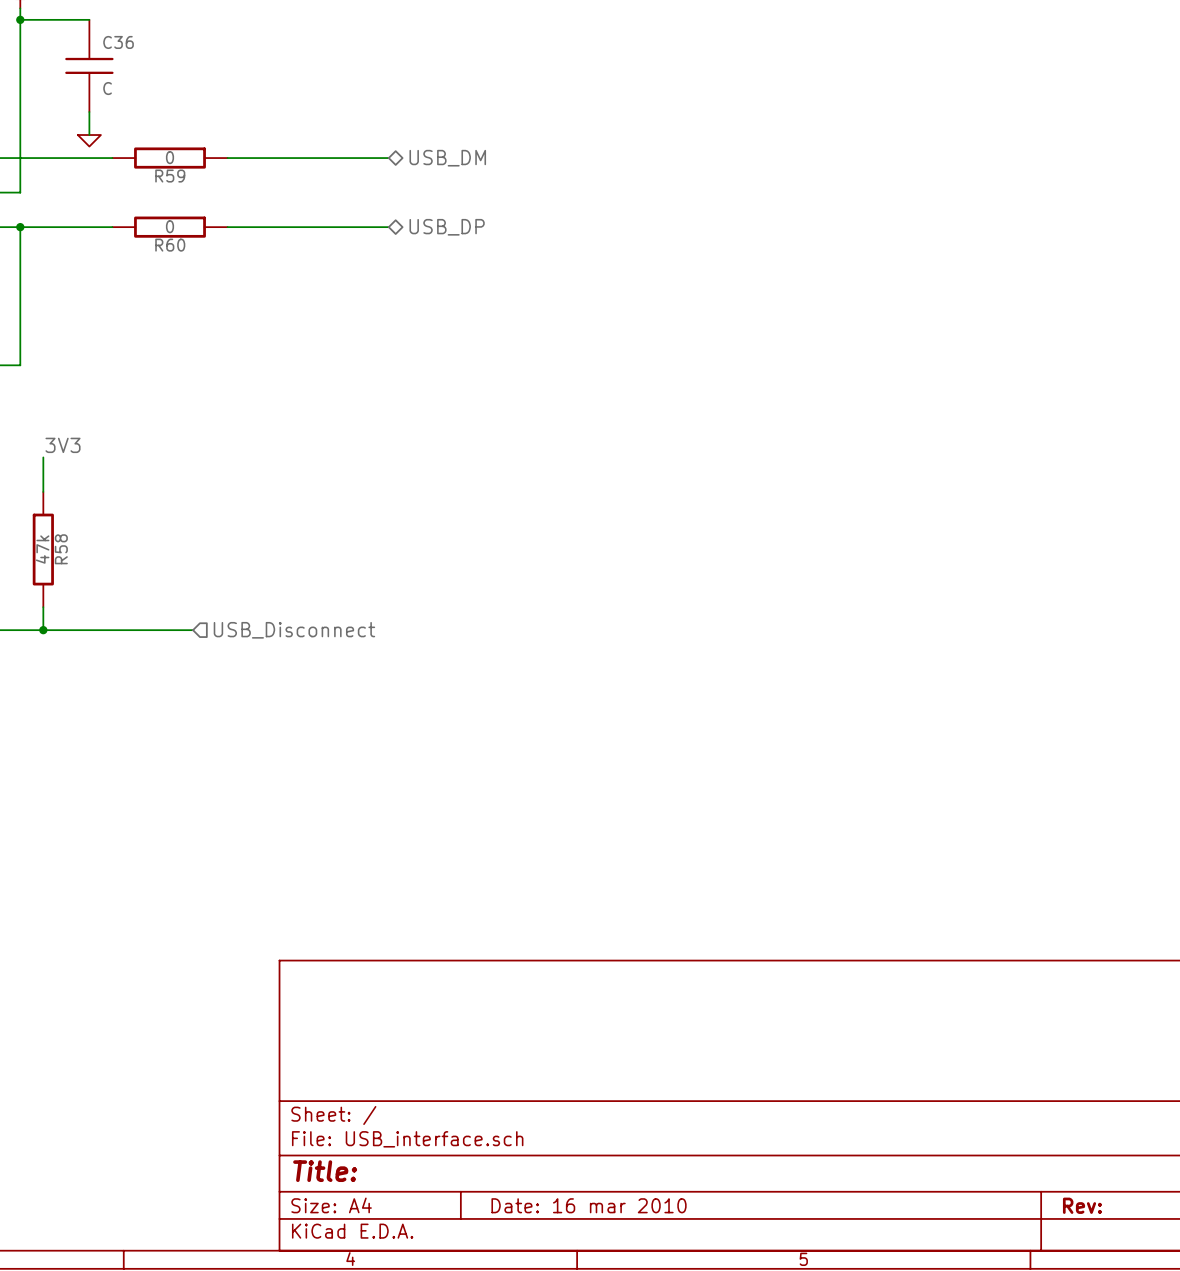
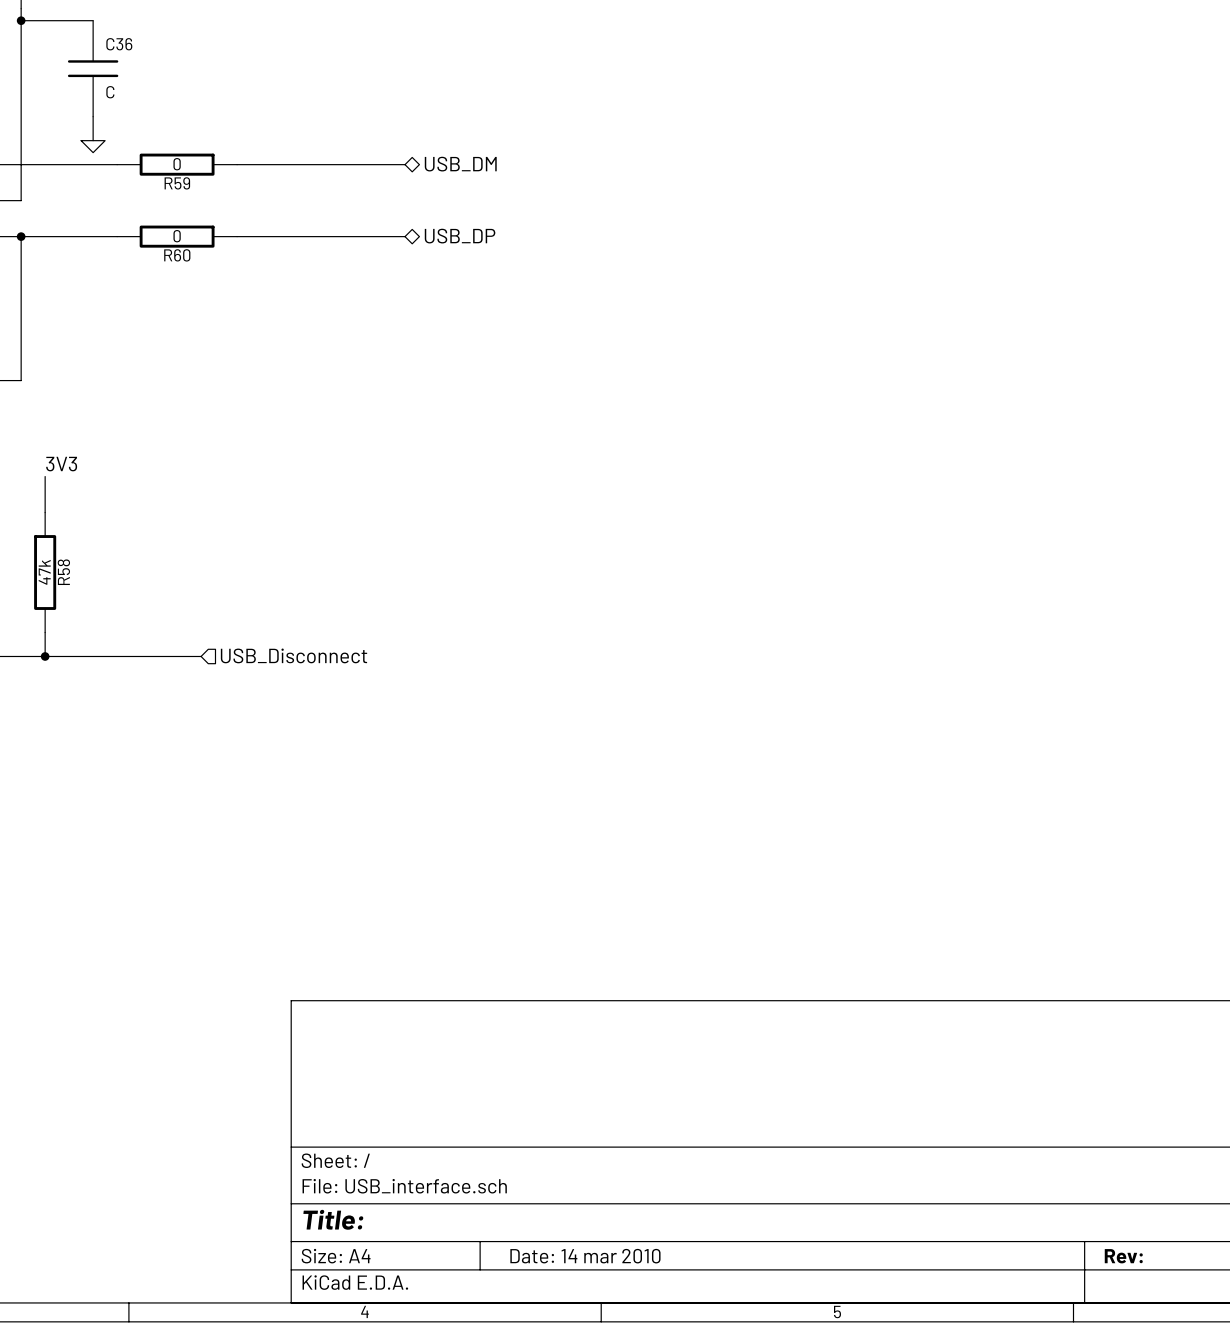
title block: Date: 16 mar 2010 (589, 1205) -> Date: 14 mar 2010 (585, 1256)

